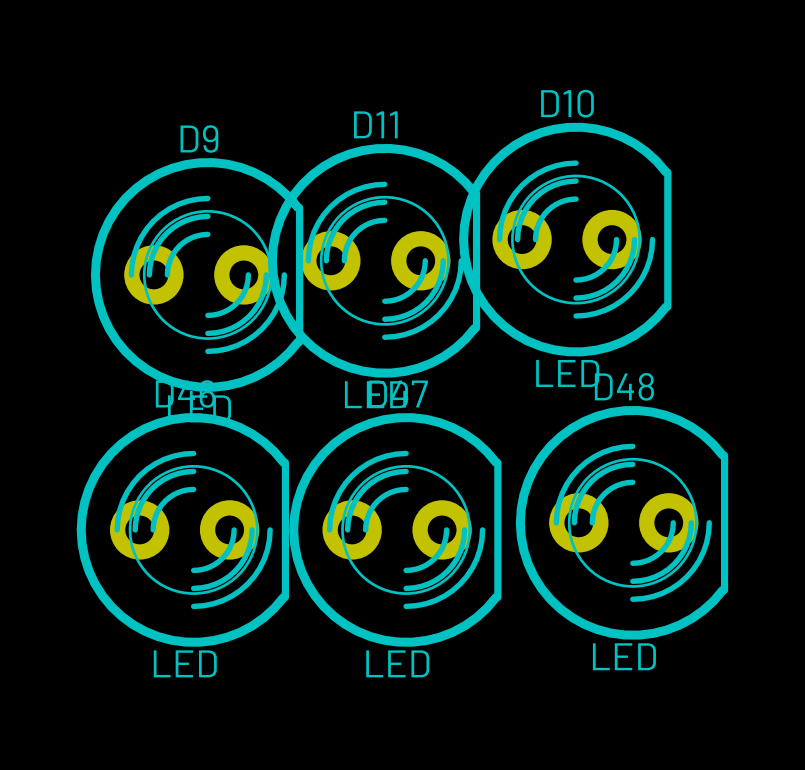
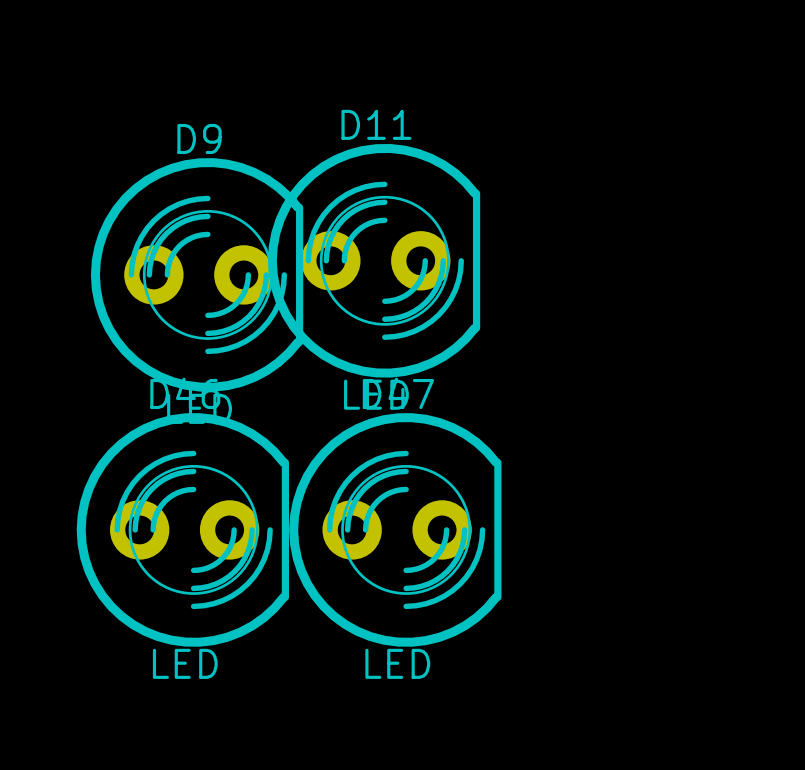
D10: LED (565, 239) -> none
D48: LED (622, 522) -> none

